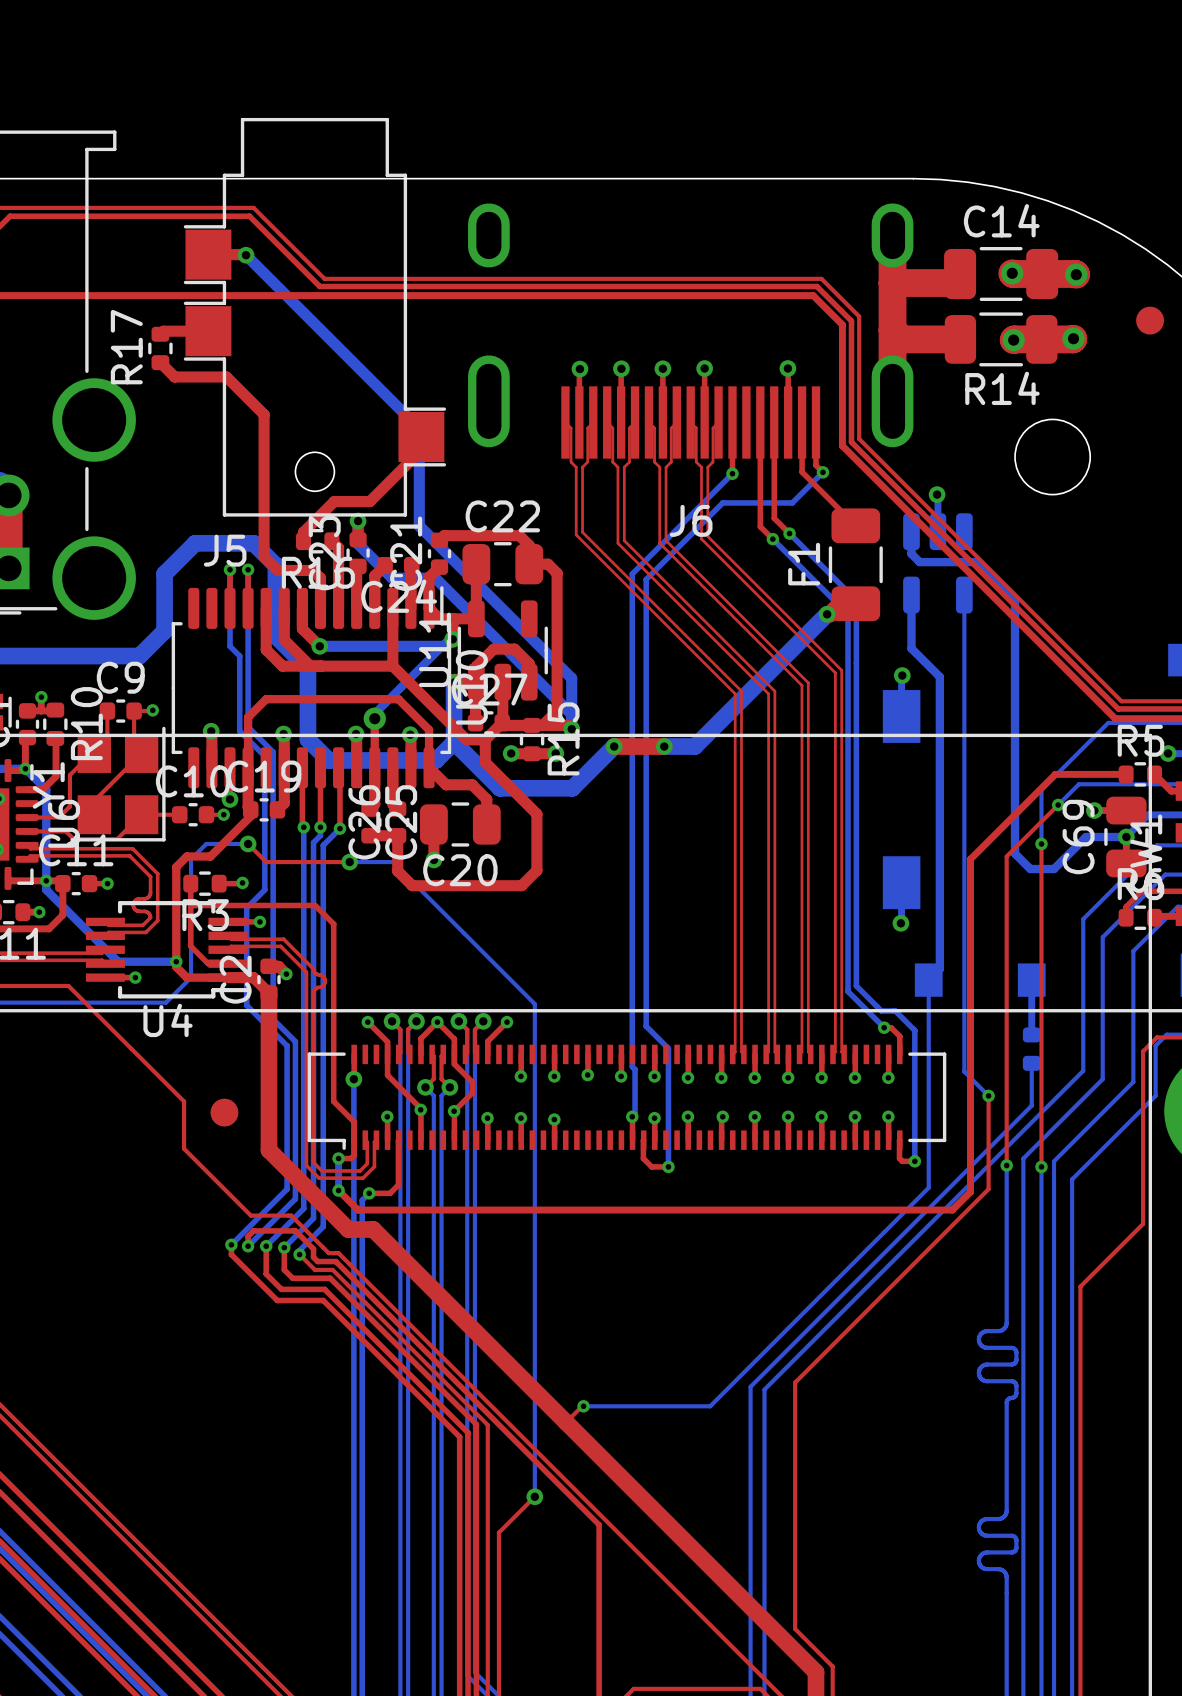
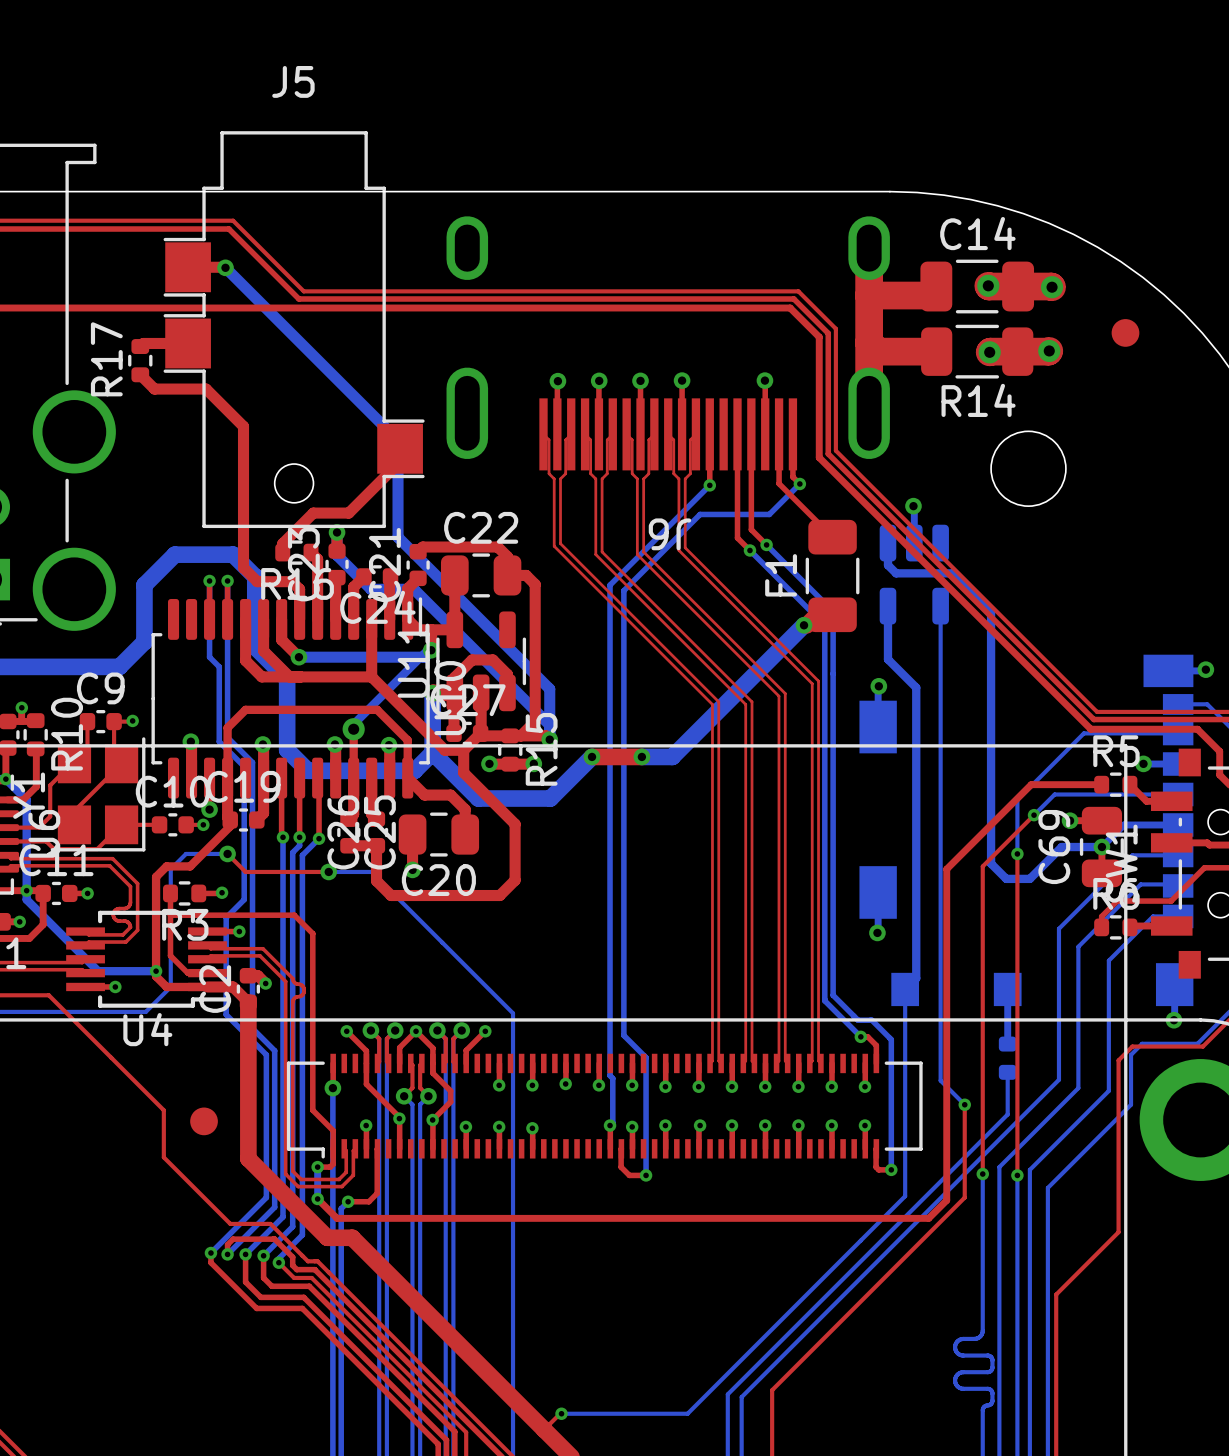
J6 name rotation: 0° (691, 520) -> 180° (669, 534)
J5 name position: J5 (225, 550) -> J5 (293, 81)

